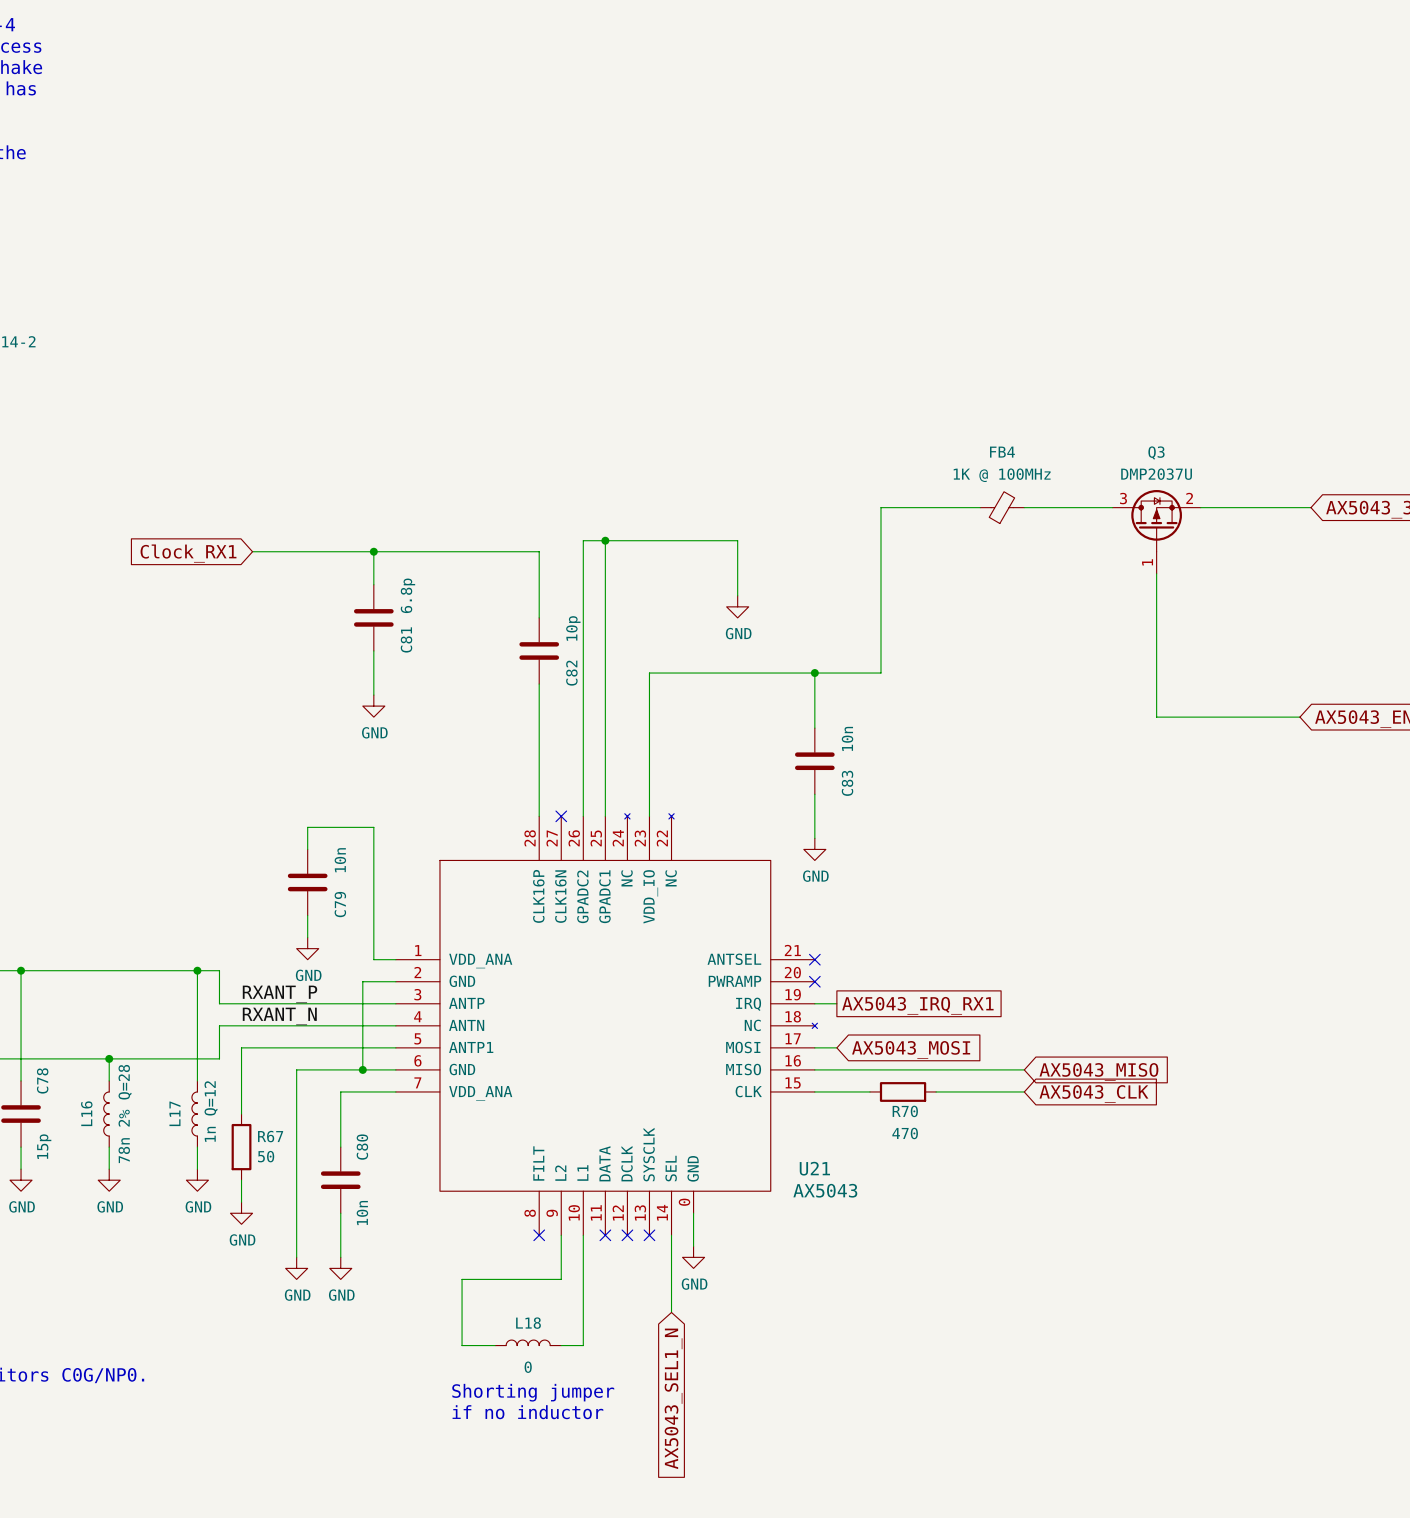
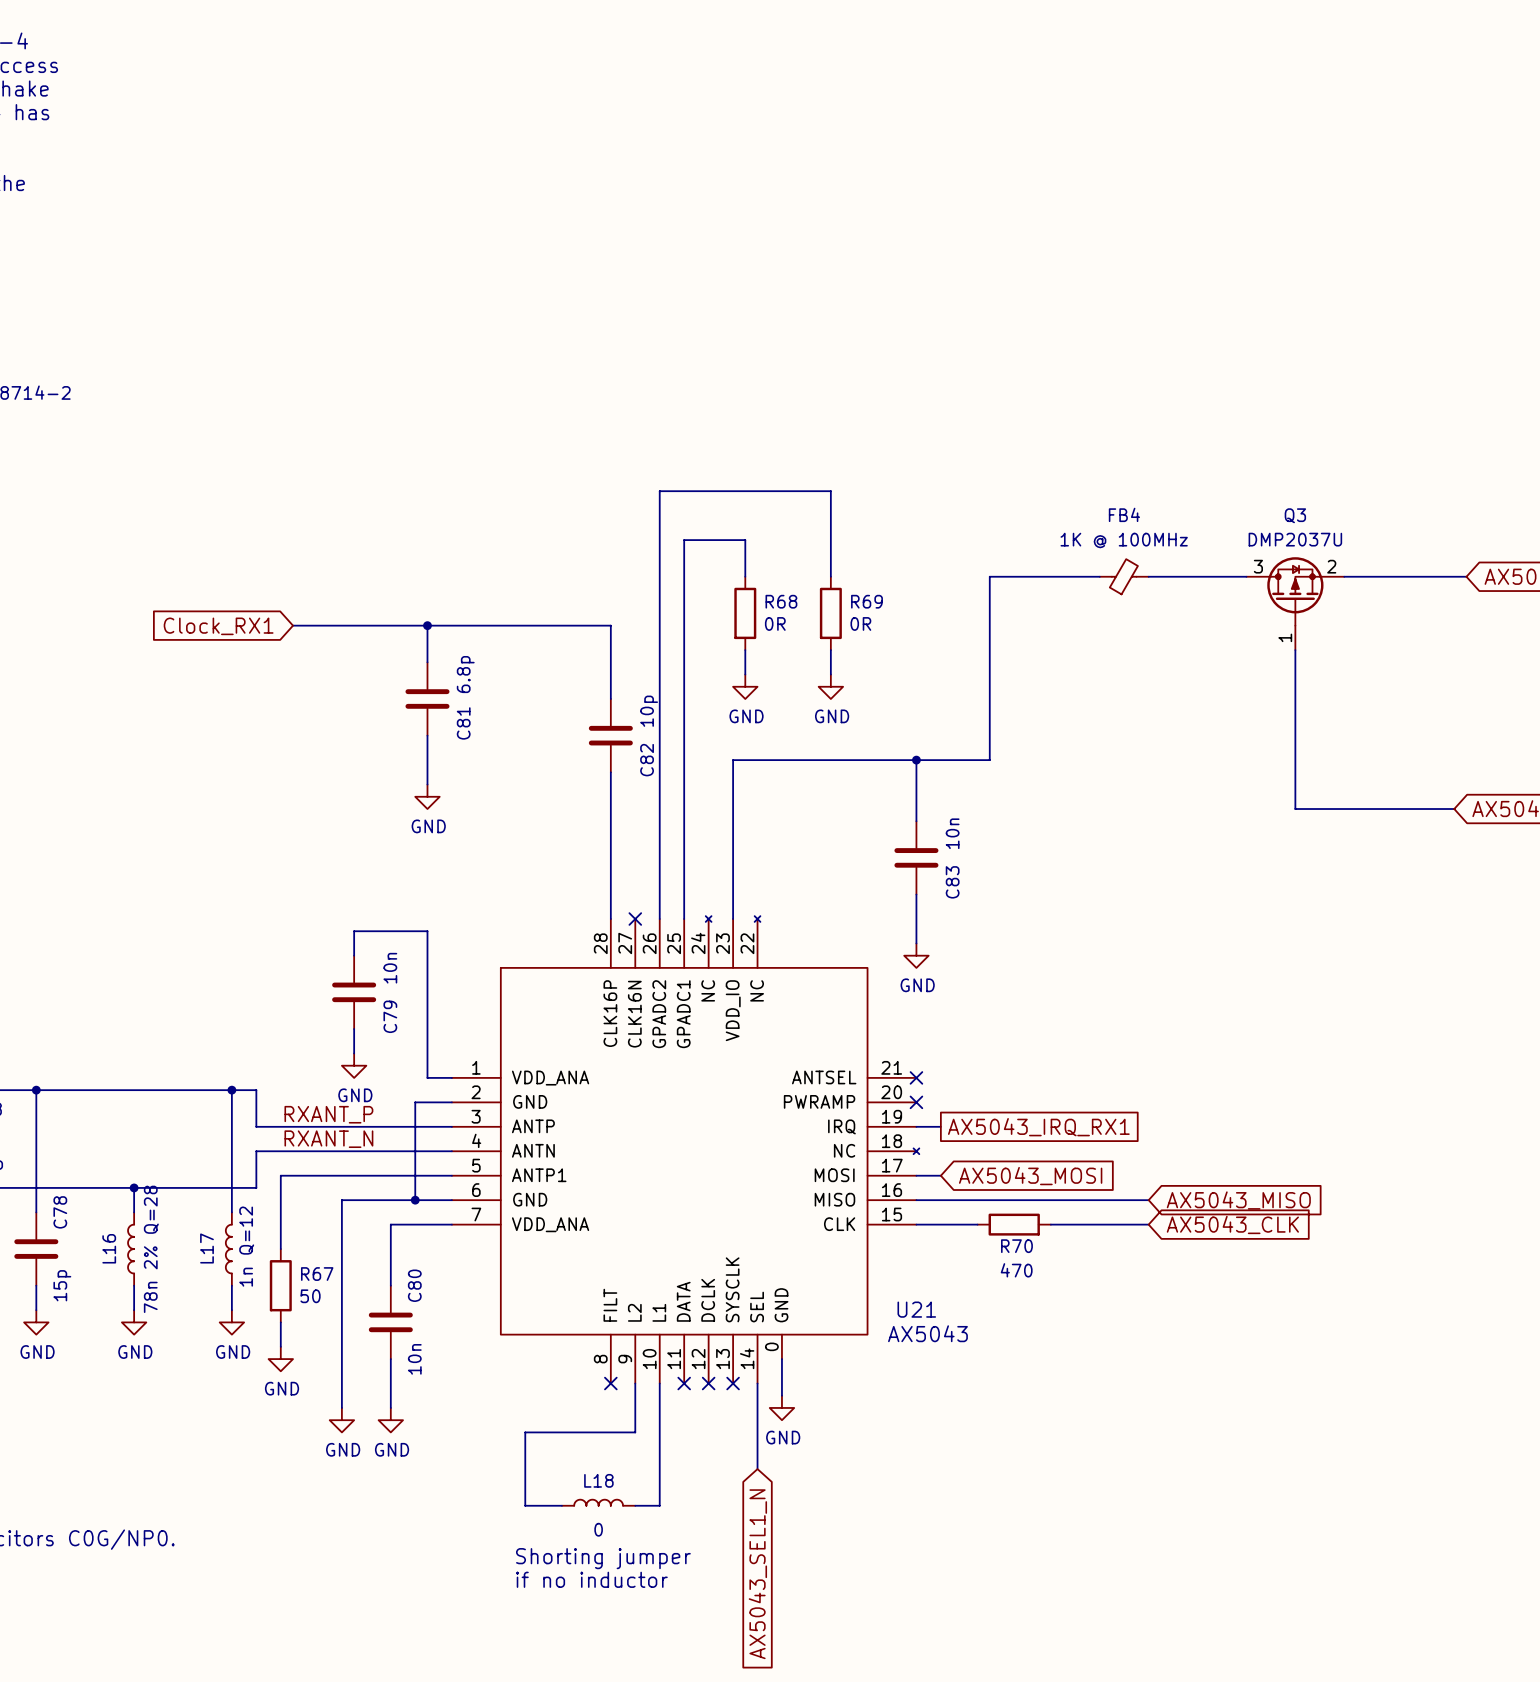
wire: none -> (745, 576) (745, 540) (684, 540) (684, 613)
wire: (583, 540) (737, 540) (737, 573) -> (659, 613) (659, 491) (830, 491) (830, 576)
junction: (605, 540) -> none
R68: none -> 0R (745, 613)
R69: none -> 0R (830, 613)
wire: none -> (745, 650) (745, 674)
power symbol: none -> GND (745, 686)

